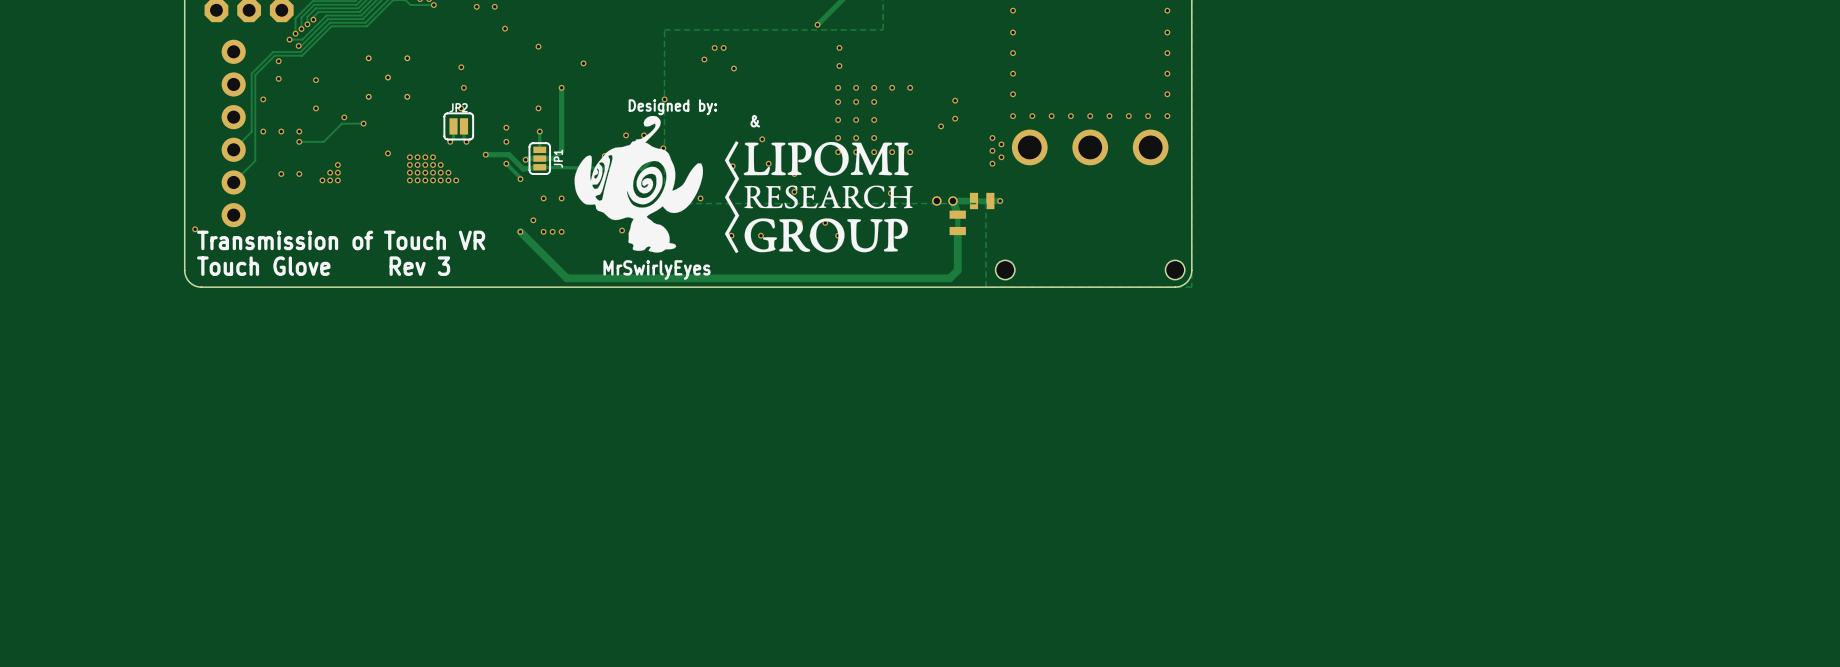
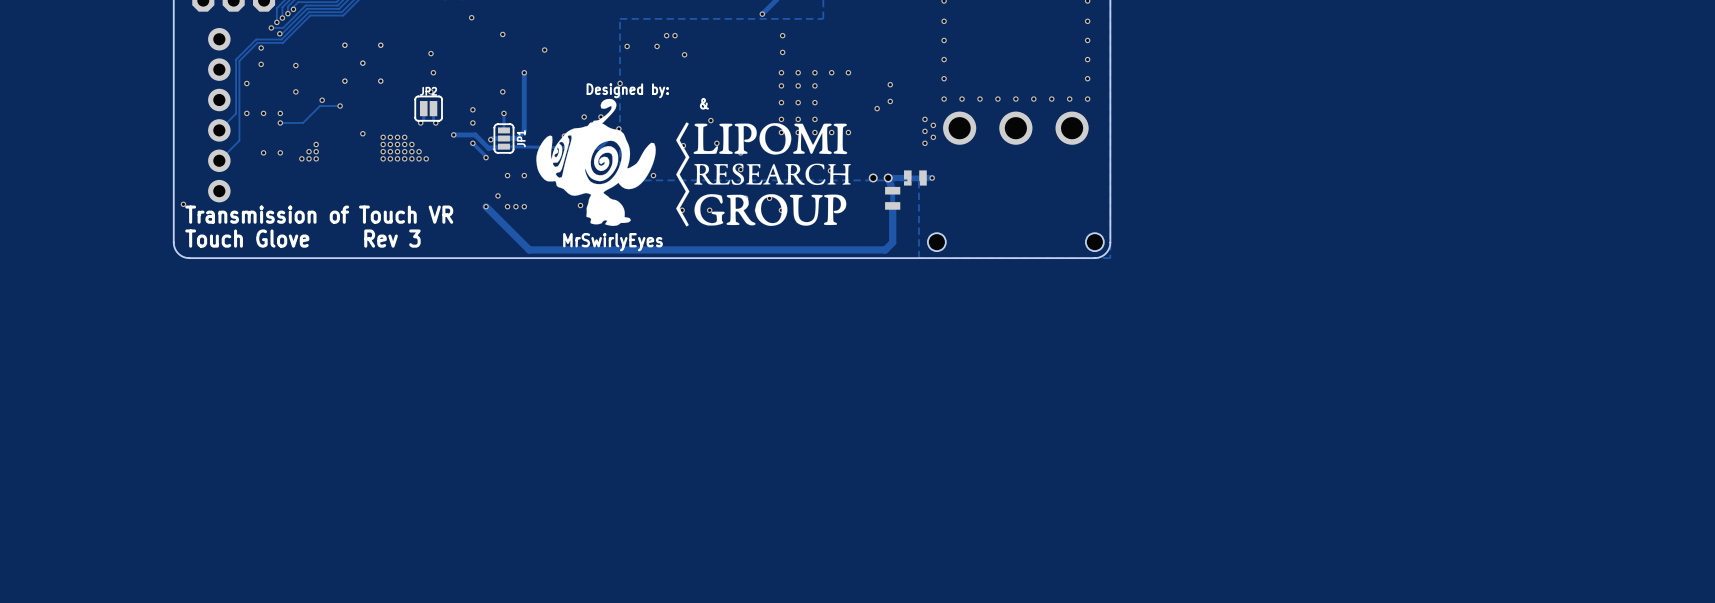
via: none -> (627, 46)

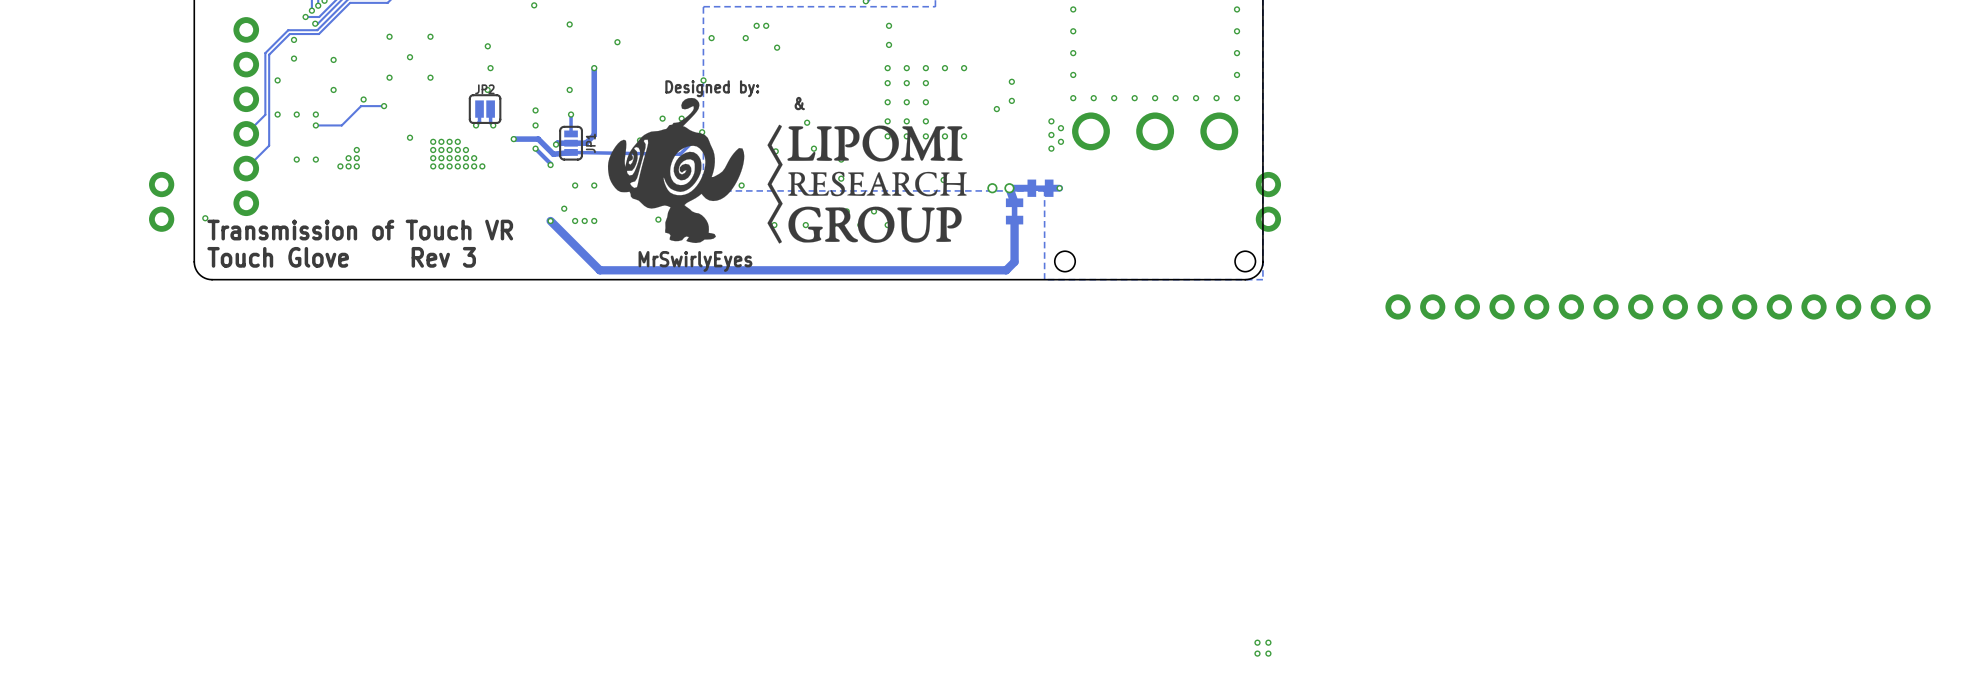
part: none -> (161, 201)
part: none -> (1268, 201)
part: none -> (1658, 306)
part: none -> (1262, 648)

